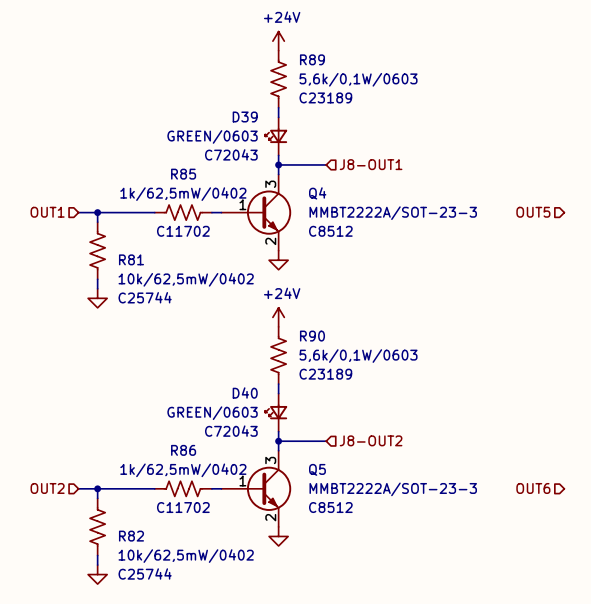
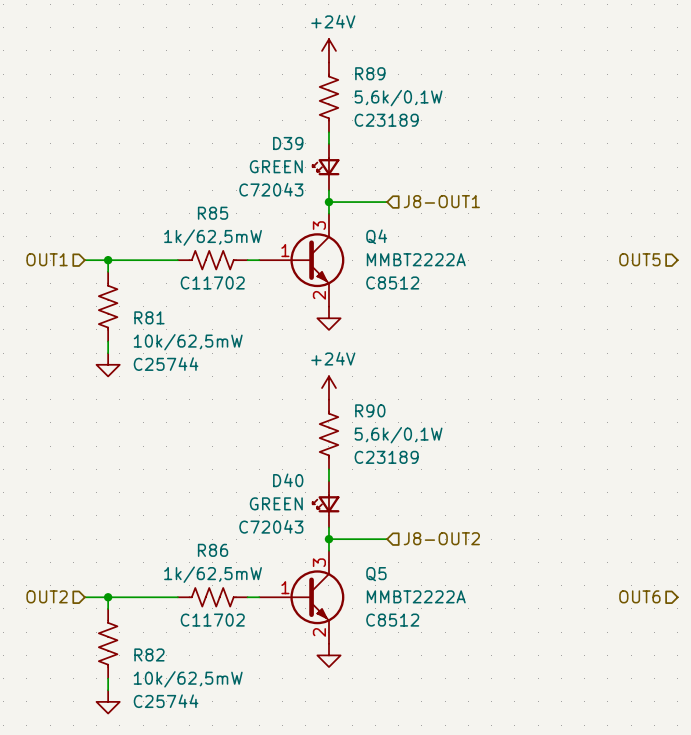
R89 value: 5,6k/0,1W/0603 (358, 79) -> 5,6k/0,1W (398, 98)
D39 value: GREEN/0603 (212, 136) -> GREEN (276, 166)
R85 value: 1k/62,5mW/0402 (183, 194) -> 1k/62,5mW (213, 237)
Q4 value: MMBT2222A/SOT-23-3 (393, 213) -> MMBT2222A (416, 259)
R81 value: 10k/62,5mW/0402 (186, 279) -> 10k/62,5mW (188, 342)
R90 value: 5,6k/0,1W/0603 (358, 356) -> 5,6k/0,1W (398, 435)
D40 value: GREEN/0603 (212, 413) -> GREEN (276, 503)
R86 value: 1k/62,5mW/0402 (183, 470) -> 1k/62,5mW (213, 574)
Q5 value: MMBT2222A/SOT-23-3 (393, 489) -> MMBT2222A (416, 596)
R82 value: 10k/62,5mW/0402 (186, 556) -> 10k/62,5mW (188, 679)

